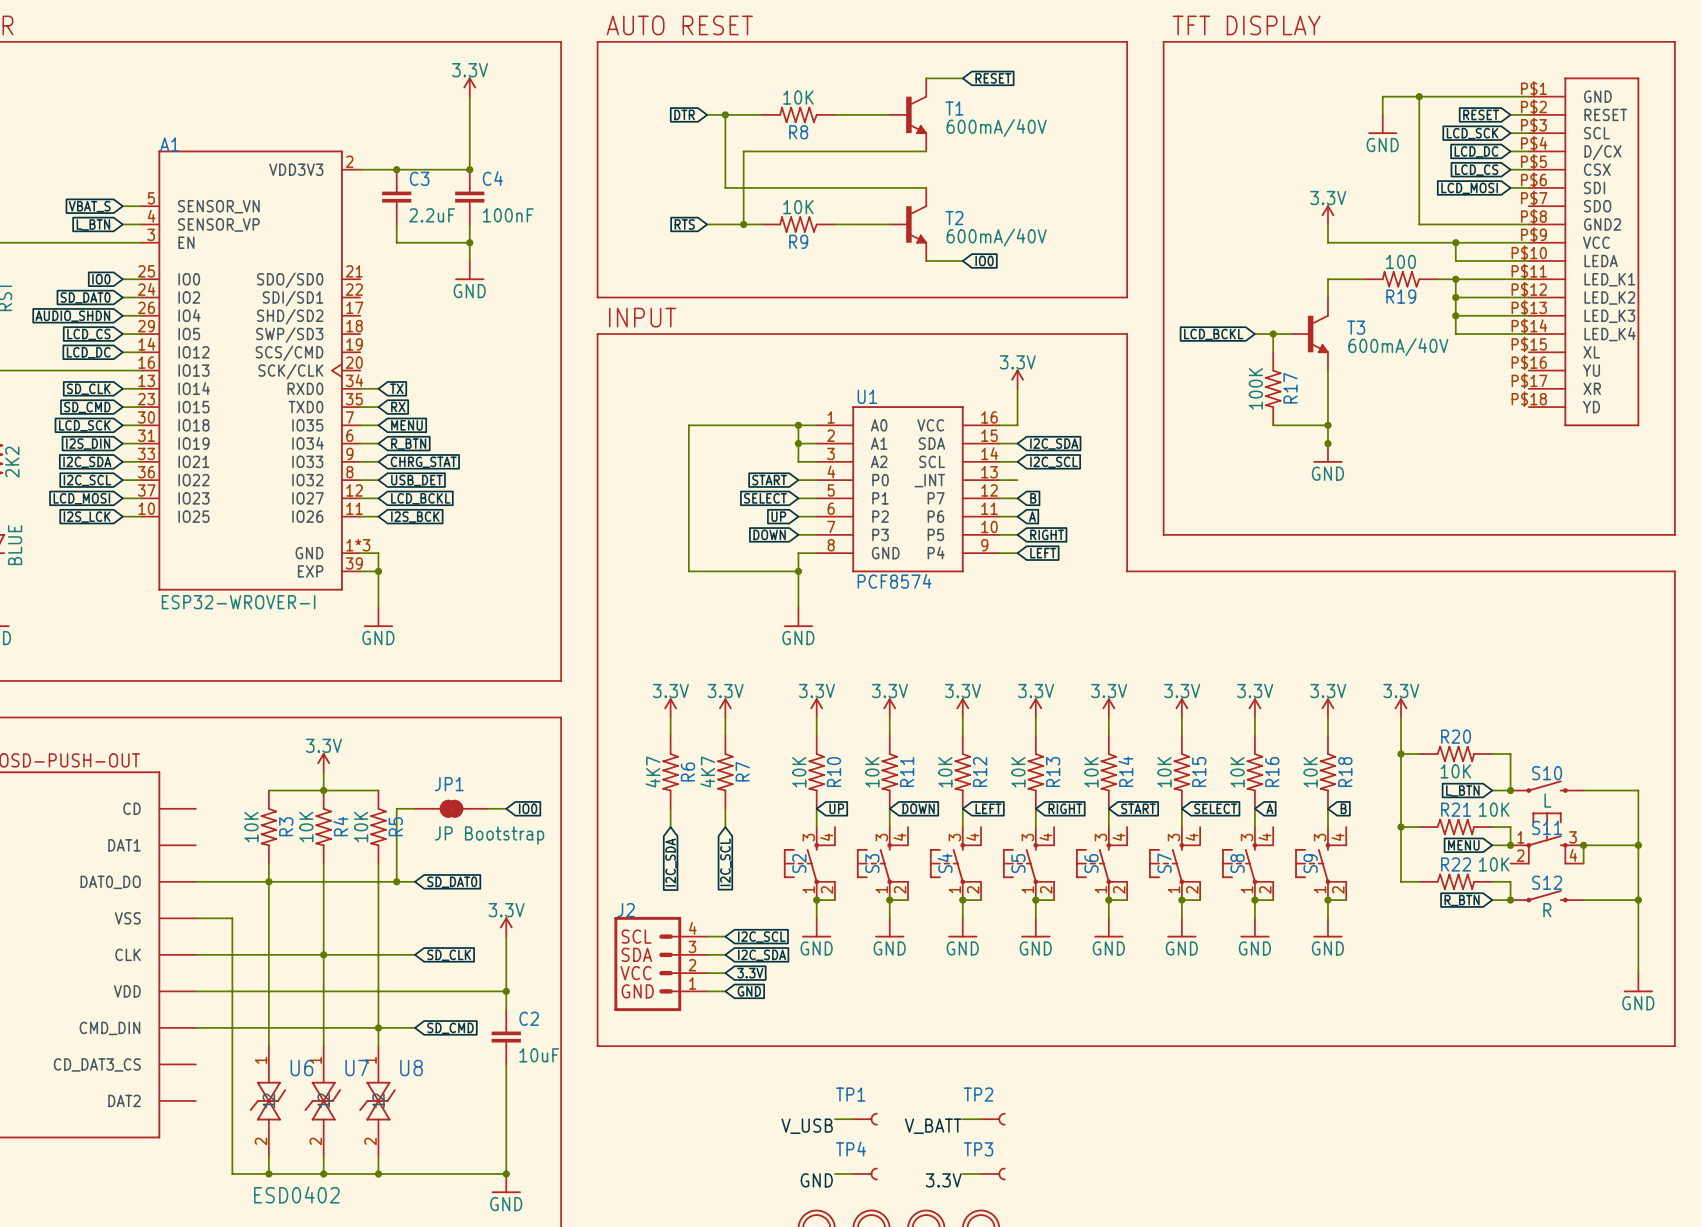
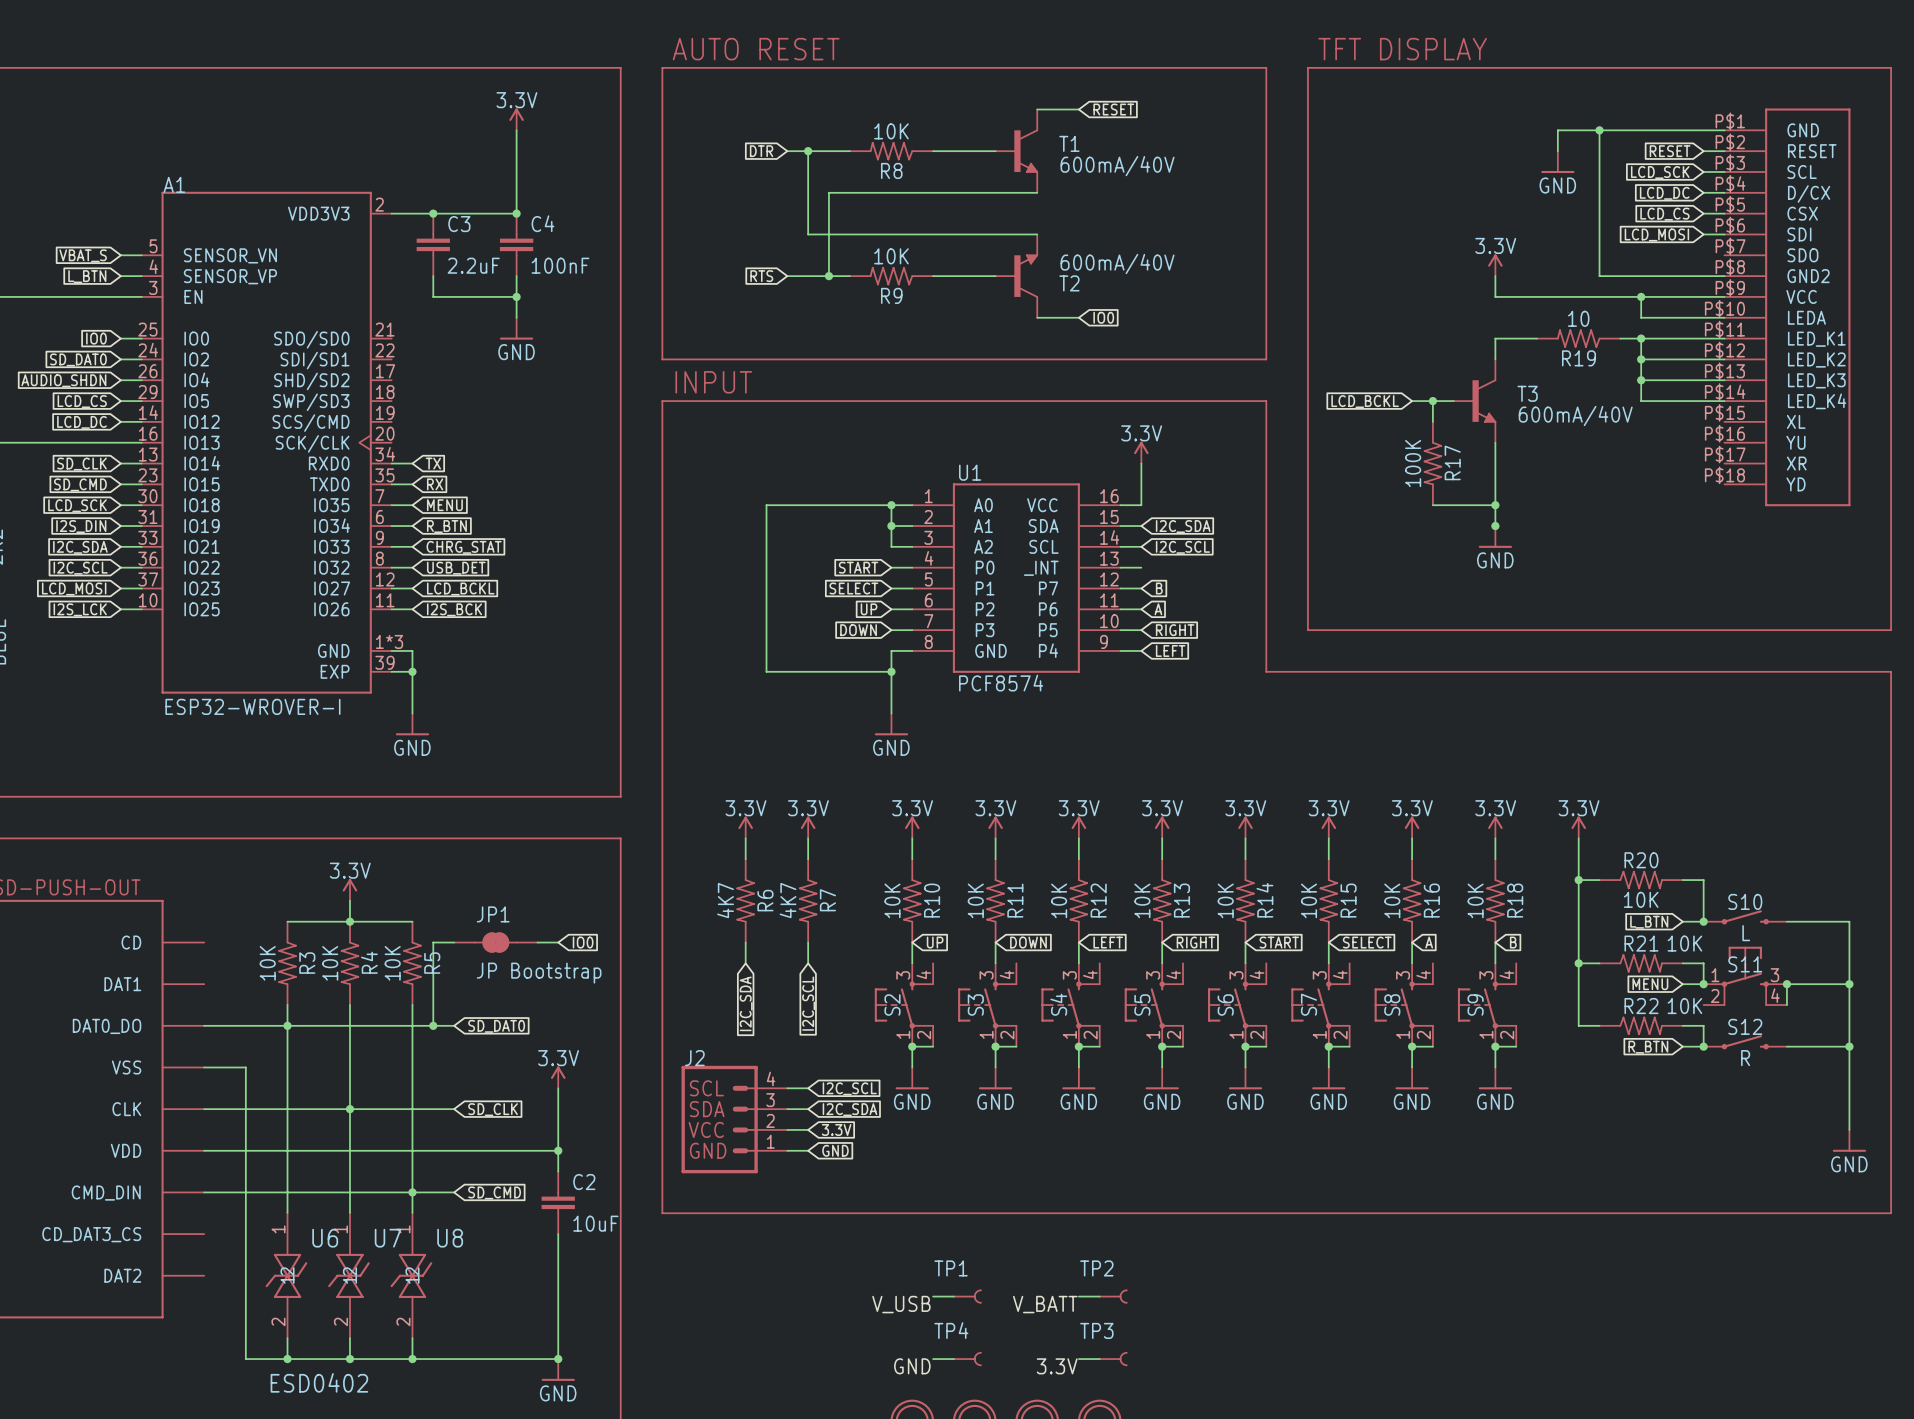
T2 flip: as is (916, 224) -> up-down (1026, 276)
R19 value: 100 (1401, 261) -> 10 (1578, 318)

